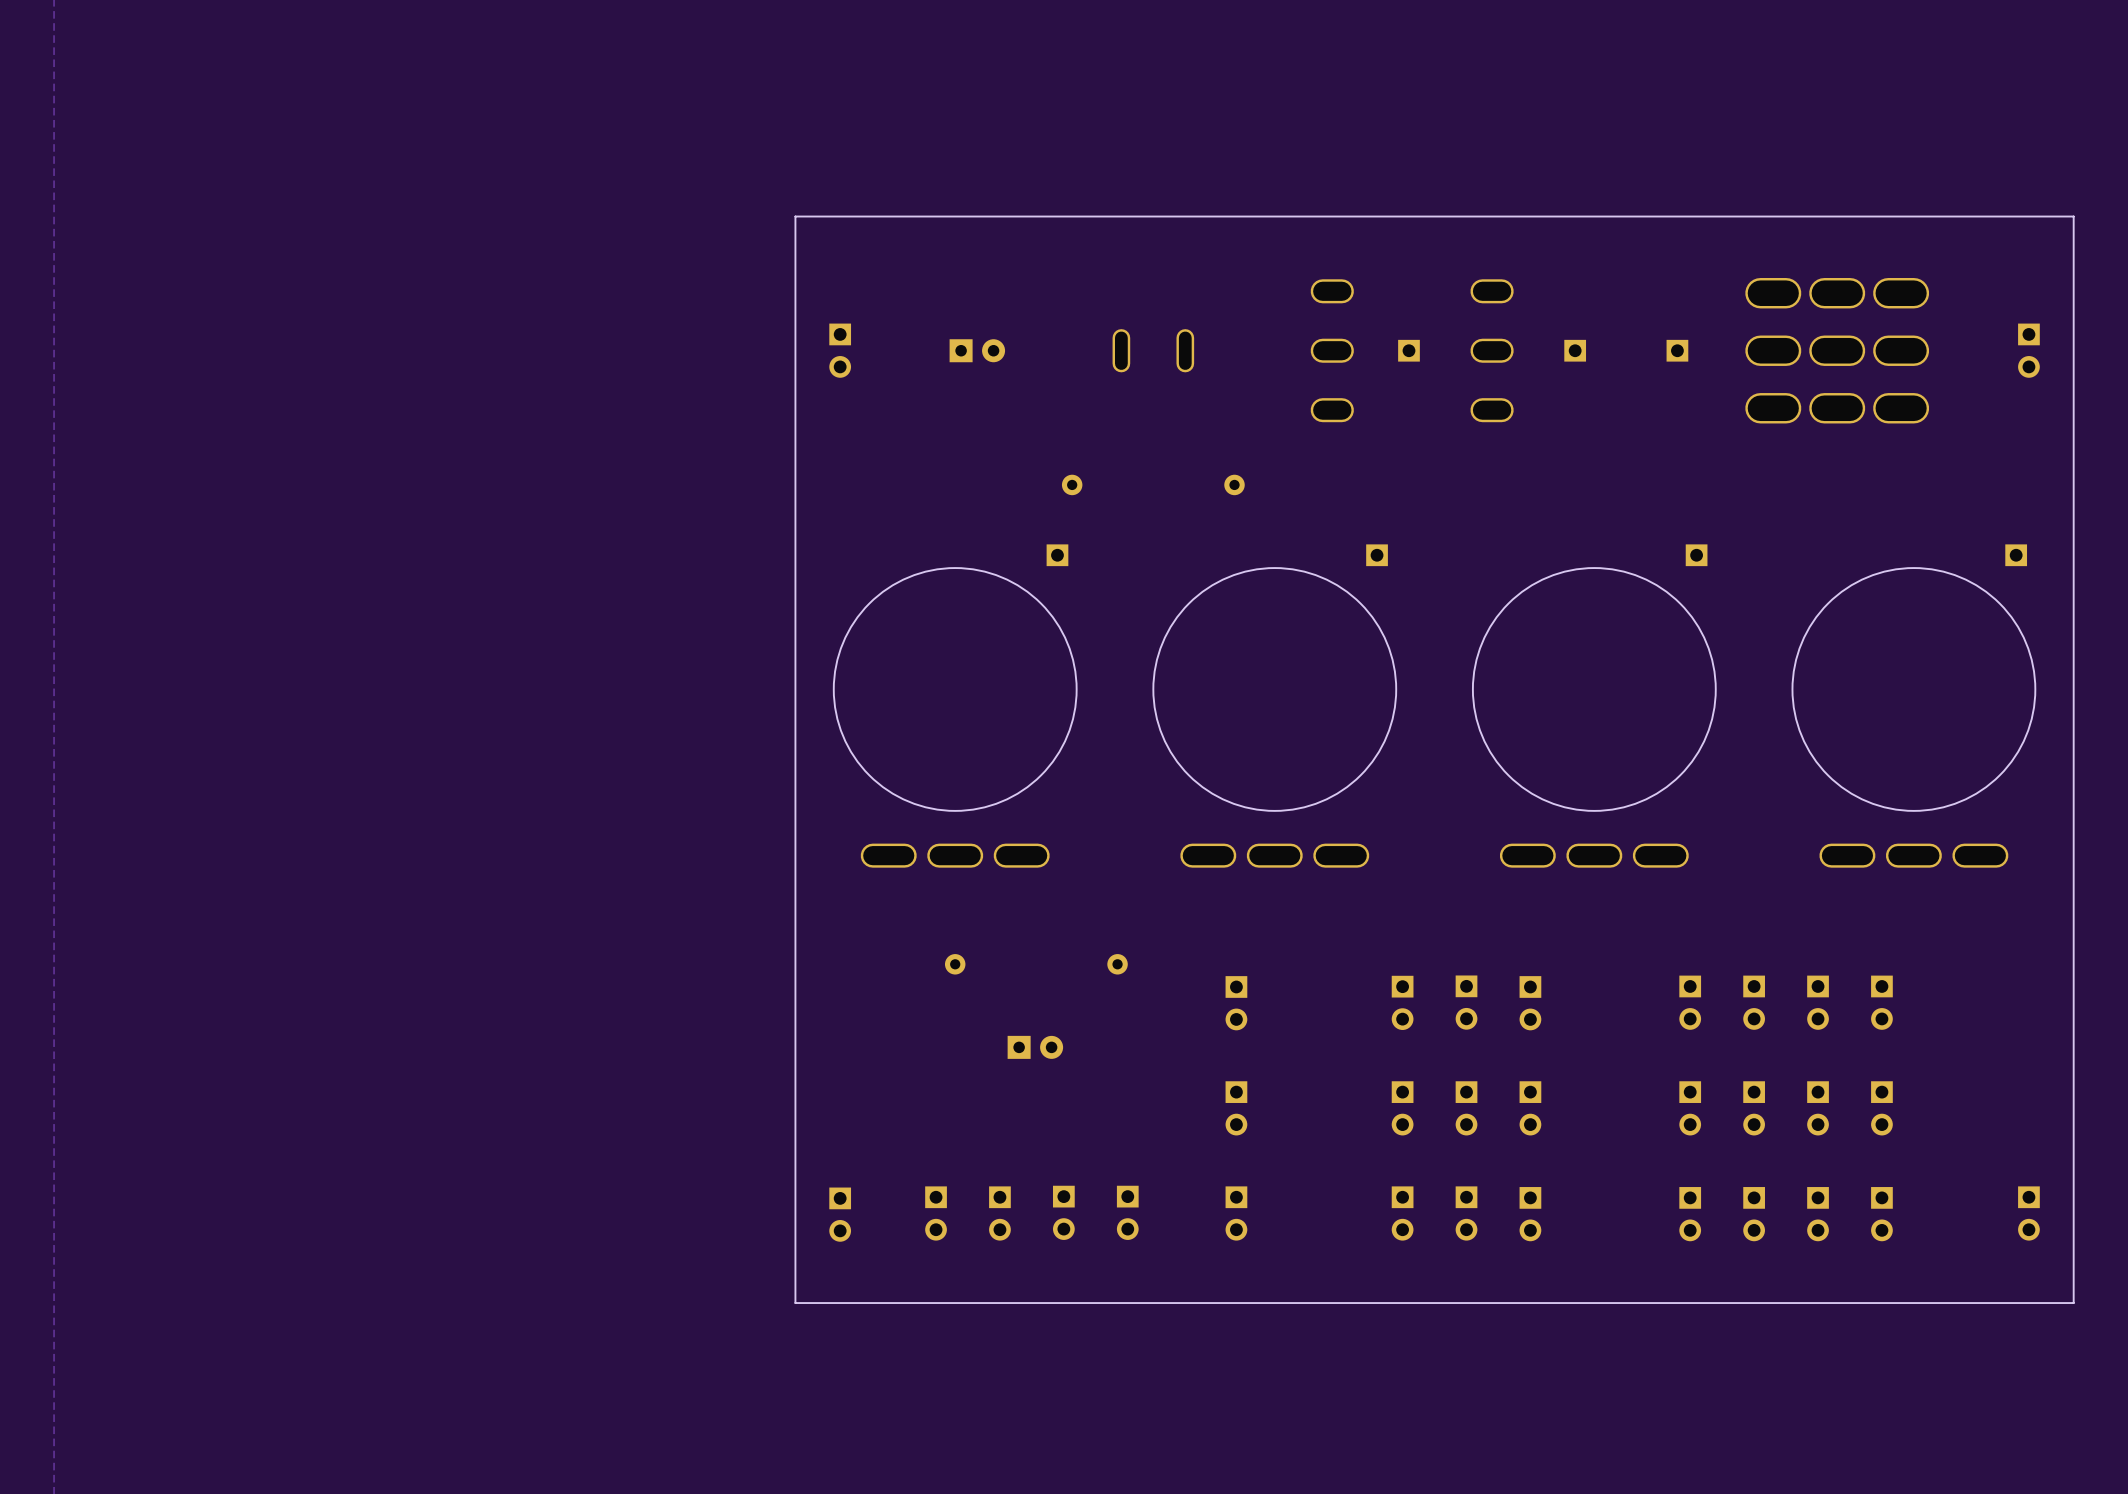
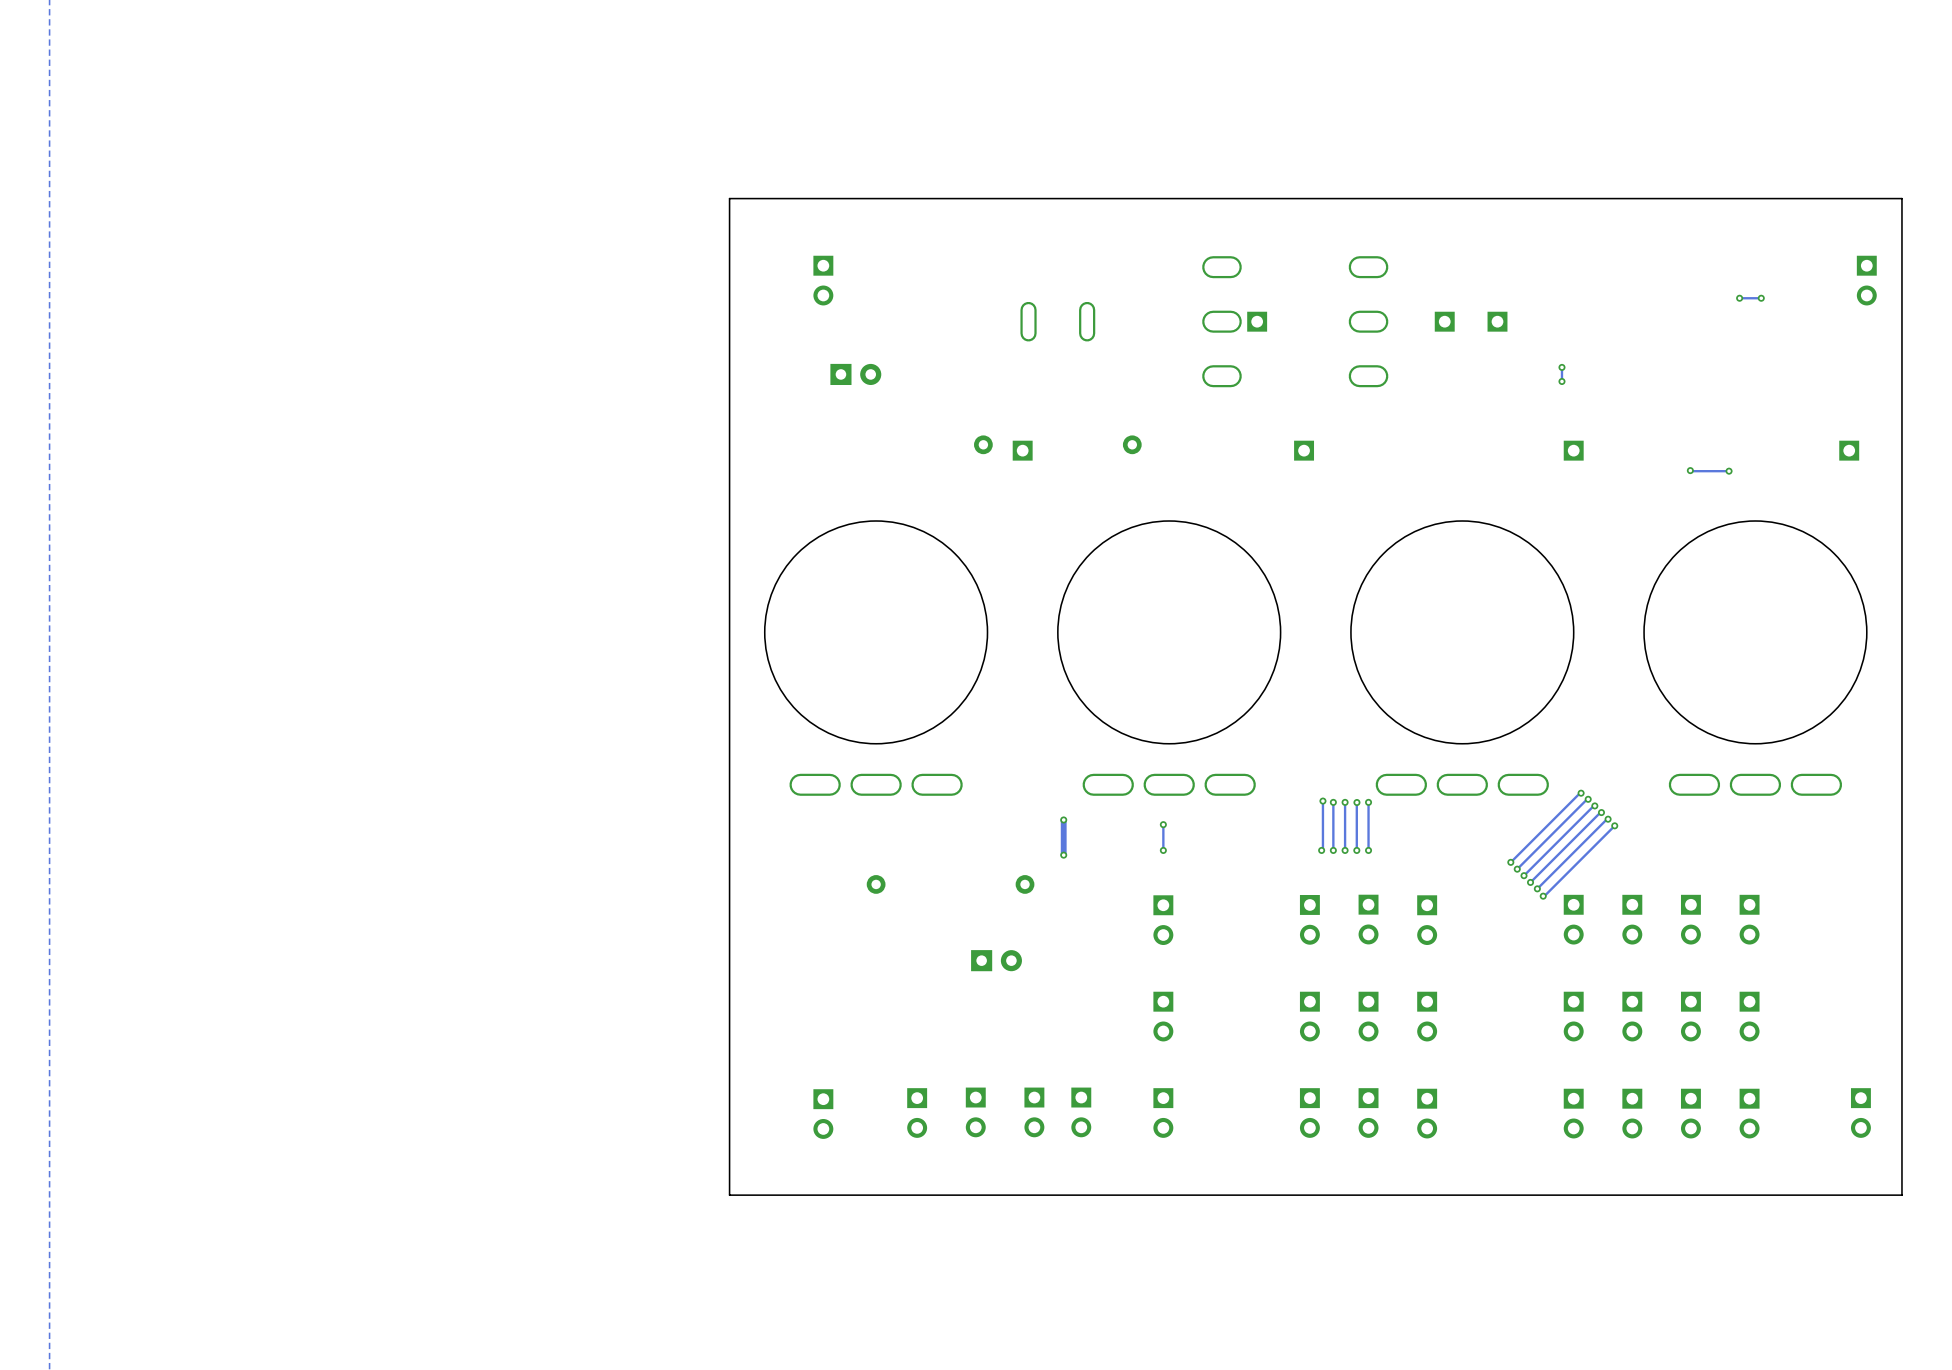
via: none -> (1739, 298)
track: none -> (1761, 298) (1739, 298)
via: none -> (1761, 298)
part position: (840, 350) -> (823, 280)
part position: (977, 350) -> (855, 374)
part position: (1408, 350) -> (1257, 321)
part position: (1677, 350) -> (1497, 321)
part: (1837, 350) -> none
part position: (2028, 350) -> (1866, 280)
track: none -> (1561, 367) (1561, 381)
via: none -> (1561, 367)
via: none -> (1561, 381)
part: none -> (1304, 450)
track: none -> (1690, 470) (1729, 471)
via: none -> (1690, 470)
via: none -> (1729, 471)
part position: (1057, 555) -> (1022, 450)
part: (1377, 555) -> none
part position: (1696, 555) -> (1573, 450)
part position: (2016, 555) -> (1849, 450)
track: none -> (1581, 793) (1510, 862)
via: none -> (1581, 793)
track: none -> (1588, 799) (1517, 869)
via: none -> (1588, 799)
track: none -> (1322, 801) (1321, 850)
via: none -> (1322, 801)
track: none -> (1333, 802) (1333, 850)
via: none -> (1333, 802)
track: none -> (1345, 802) (1345, 850)
via: none -> (1345, 802)
via: none -> (1356, 802)
track: none -> (1368, 802) (1368, 850)
via: none -> (1368, 802)
track: none -> (1356, 802) (1356, 850)
track: none -> (1594, 805) (1524, 875)
via: none -> (1594, 805)
track: none -> (1601, 812) (1530, 882)
via: none -> (1601, 812)
track: none -> (1063, 819) (1063, 855)
via: none -> (1063, 819)
track: none -> (1608, 819) (1537, 888)
via: none -> (1608, 819)
track: none -> (1163, 824) (1163, 850)
via: none -> (1163, 824)
track: none -> (1614, 825) (1543, 896)
via: none -> (1614, 825)
via: none -> (1163, 850)
via: none -> (1321, 850)
via: none -> (1333, 850)
via: none -> (1345, 850)
via: none -> (1356, 850)
via: none -> (1368, 850)
via: none -> (1063, 855)
via: none -> (1510, 862)
via: none -> (1517, 869)
via: none -> (1524, 875)
via: none -> (1530, 882)
via: none -> (1537, 888)
via: none -> (1543, 896)
part: (1402, 1002) -> none
part: none -> (1309, 919)
part: (1466, 1002) -> none
part: none -> (1368, 919)
part: (1690, 1002) -> none
part: none -> (1573, 919)
part: (1754, 1002) -> none
part: none -> (1632, 919)
part: (1818, 1002) -> none
part: none -> (1690, 919)
part: (1881, 1002) -> none
part: none -> (1749, 919)
part position: (1236, 1003) -> (1163, 920)
part: (1530, 1003) -> none
part: none -> (1427, 920)
part position: (1035, 1047) -> (996, 960)
part position: (1236, 1108) -> (1163, 1016)
part: (1402, 1108) -> none
part: none -> (1309, 1016)
part: (1466, 1108) -> none
part: none -> (1368, 1016)
part: (1530, 1108) -> none
part: none -> (1427, 1016)
part: (1690, 1108) -> none
part: none -> (1573, 1016)
part: (1754, 1108) -> none
part: none -> (1632, 1016)
part: (1818, 1108) -> none
part: none -> (1690, 1016)
part: (1881, 1108) -> none
part: none -> (1749, 1016)
part: none -> (1081, 1112)
part: (936, 1213) -> none
part: (1236, 1213) -> none
part: none -> (1163, 1113)
part: (1402, 1213) -> none
part: none -> (1309, 1113)
part: (1466, 1213) -> none
part: none -> (1368, 1113)
part: (840, 1214) -> none
part: none -> (823, 1114)
part: (1530, 1214) -> none
part: none -> (1427, 1113)
part: (1690, 1214) -> none
part: none -> (1573, 1113)
part: (1754, 1214) -> none
part: none -> (1632, 1113)
part: (1818, 1214) -> none
part: none -> (1690, 1113)
part: (1881, 1214) -> none
part: none -> (1749, 1113)

